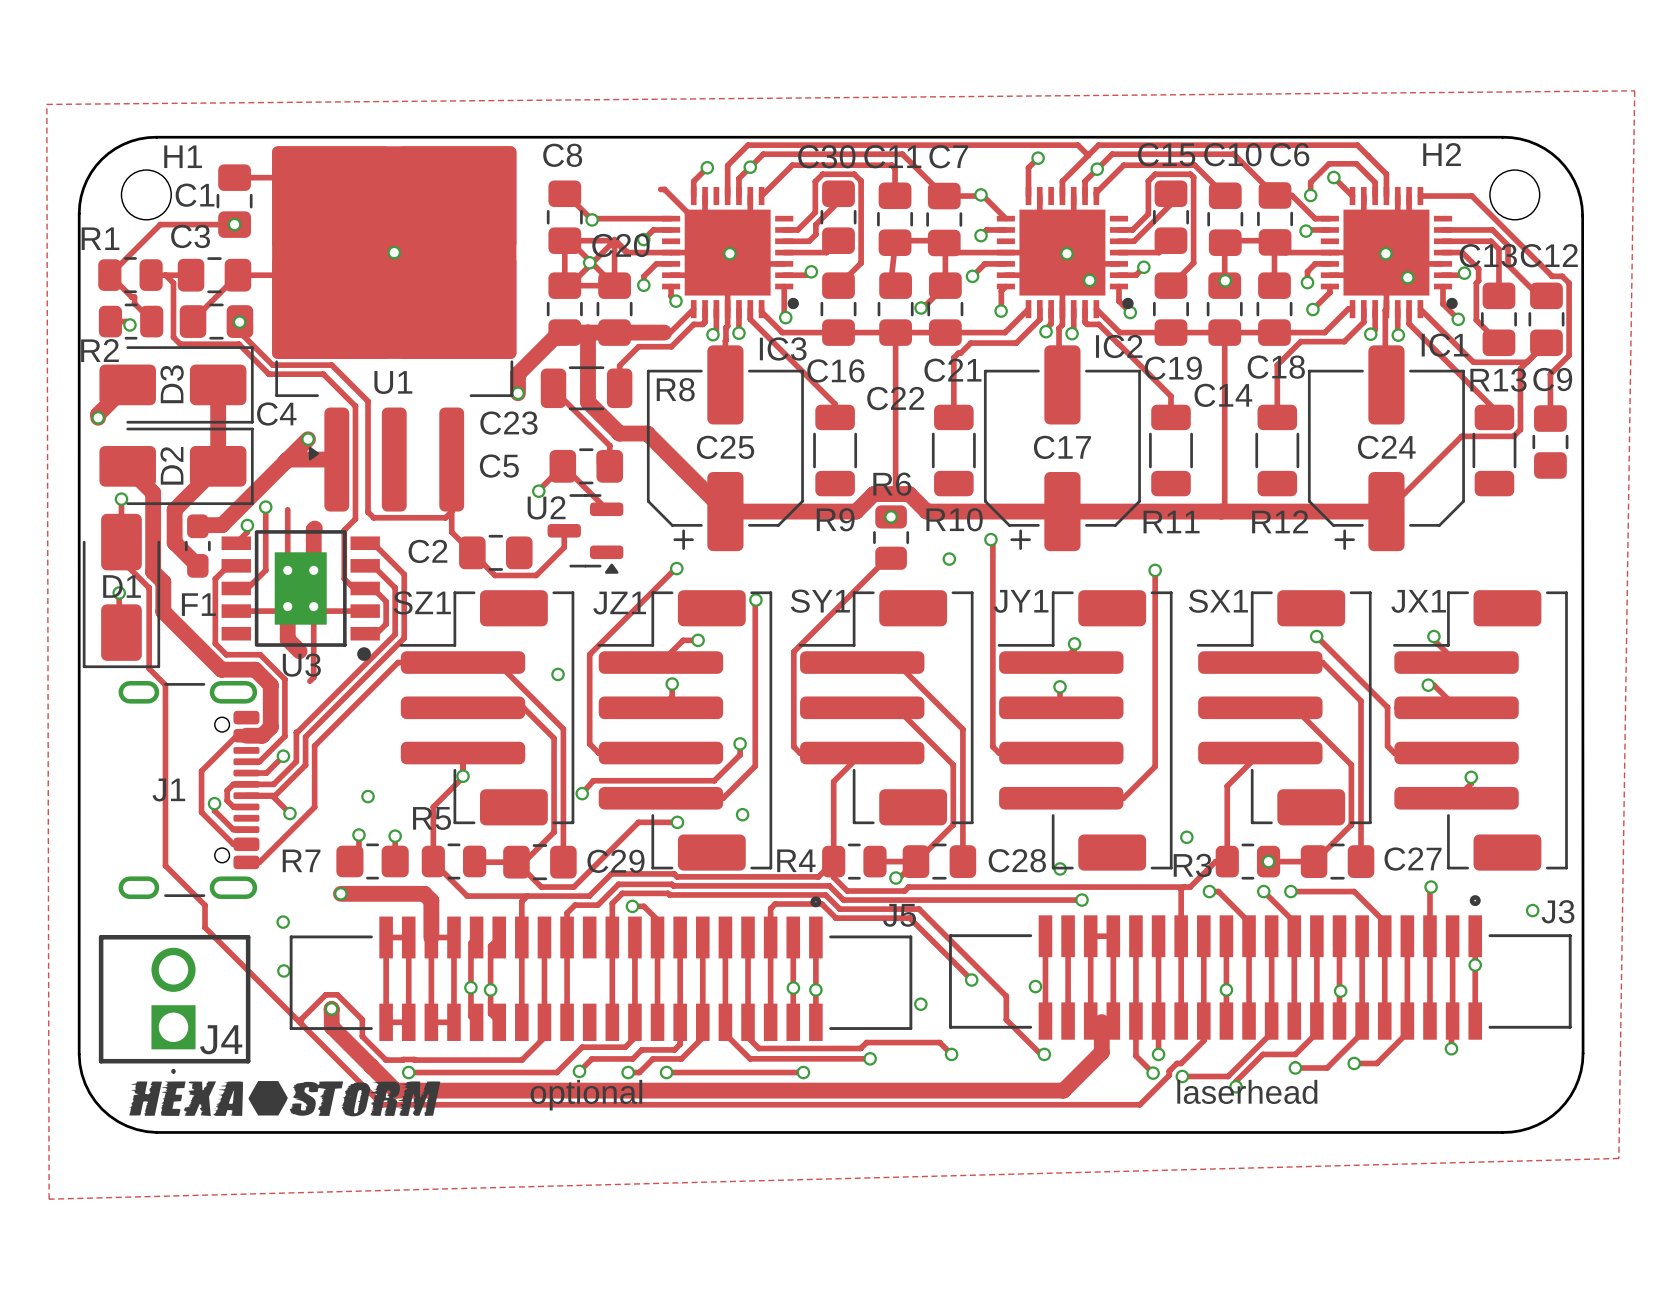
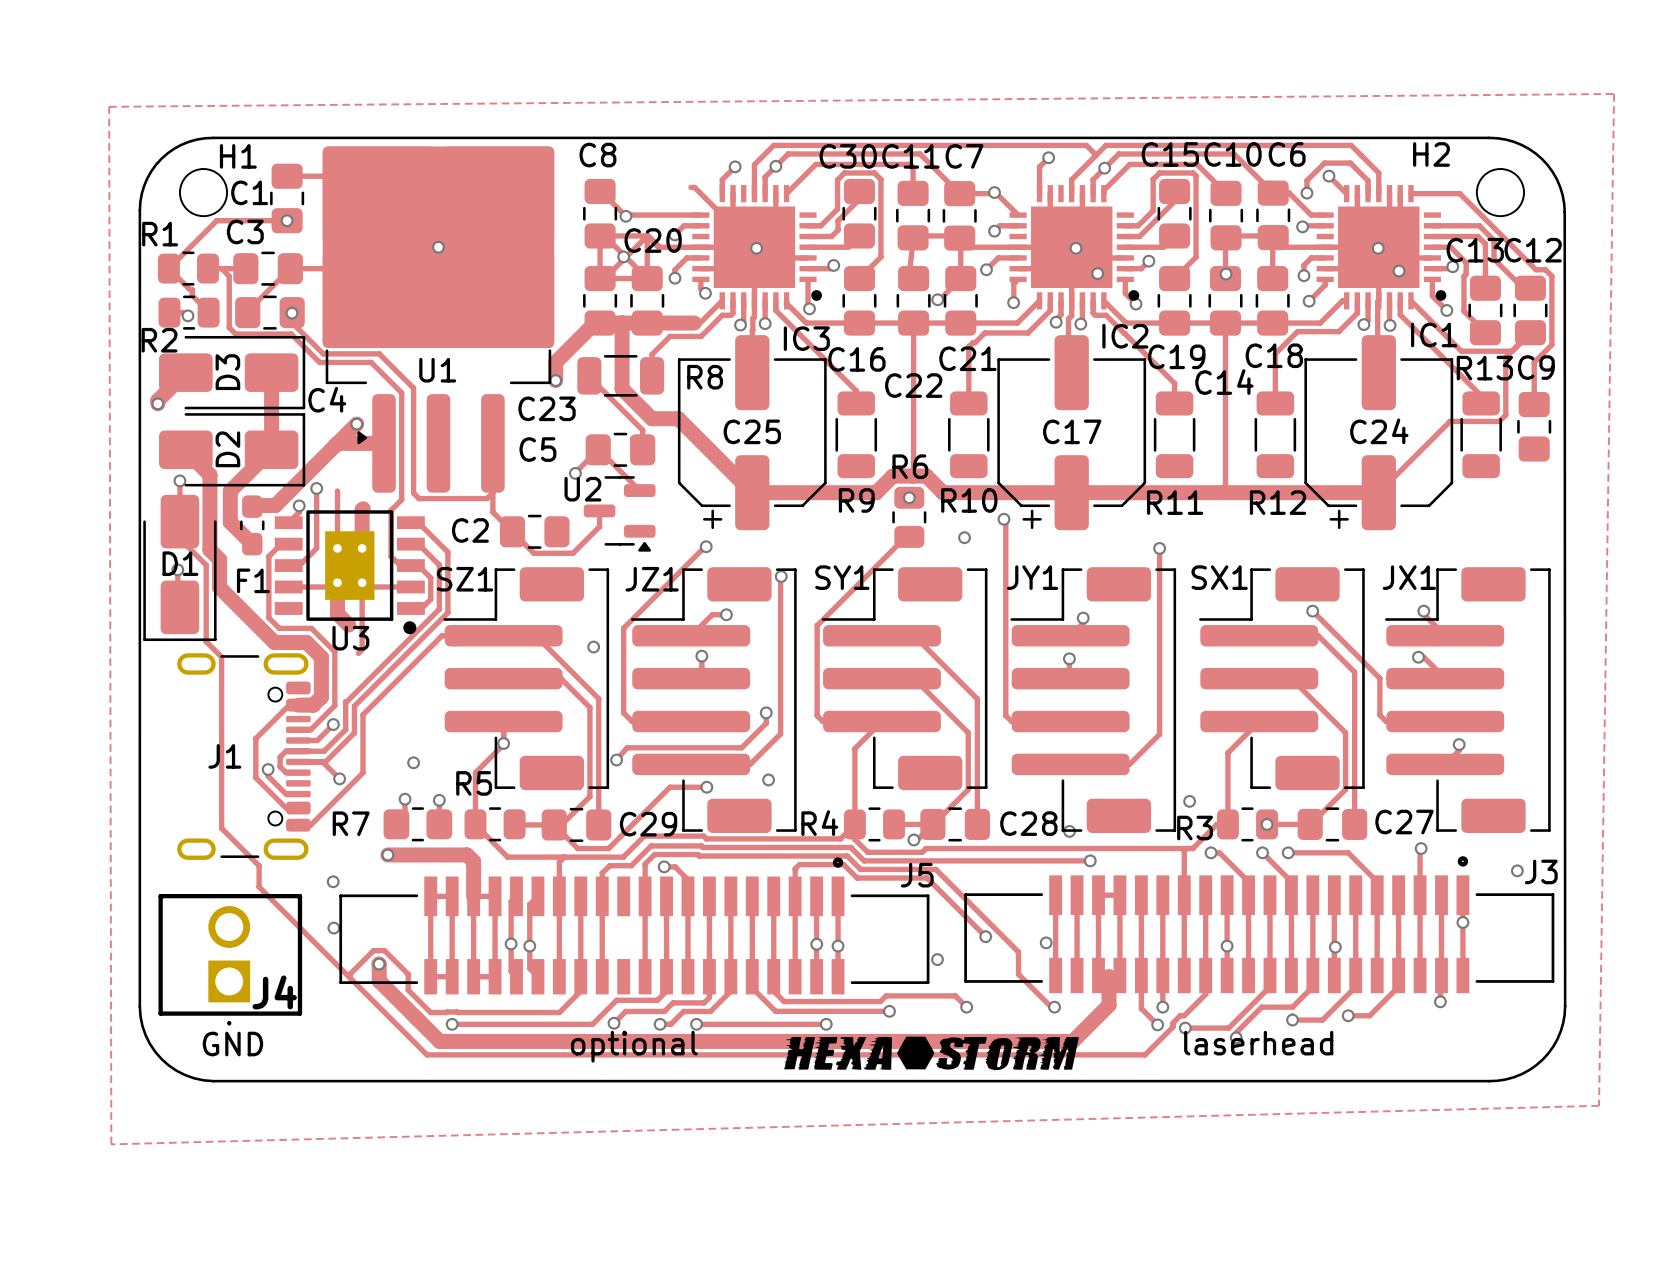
drawing: [128, 1081, 441, 1117] -> none
drawing: none -> [783, 1036, 1079, 1071]
text: none -> GND (232, 1044)

